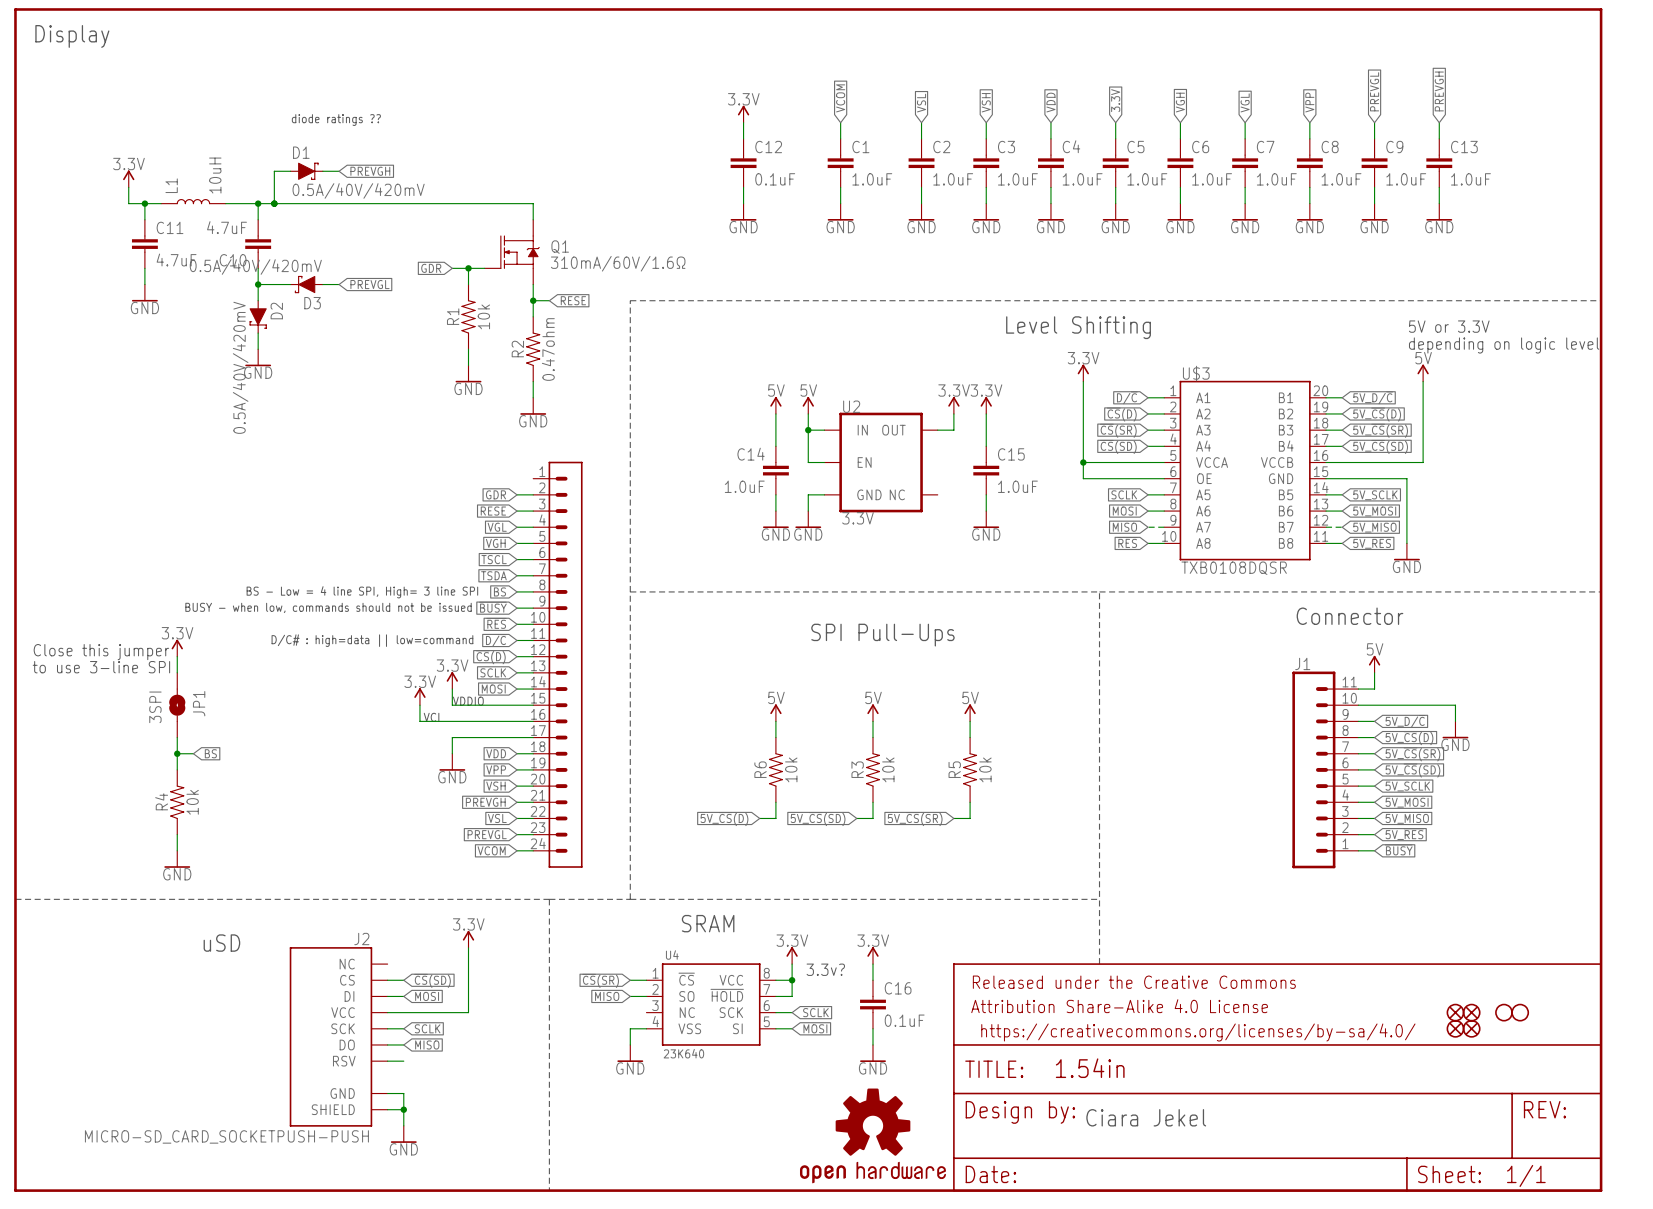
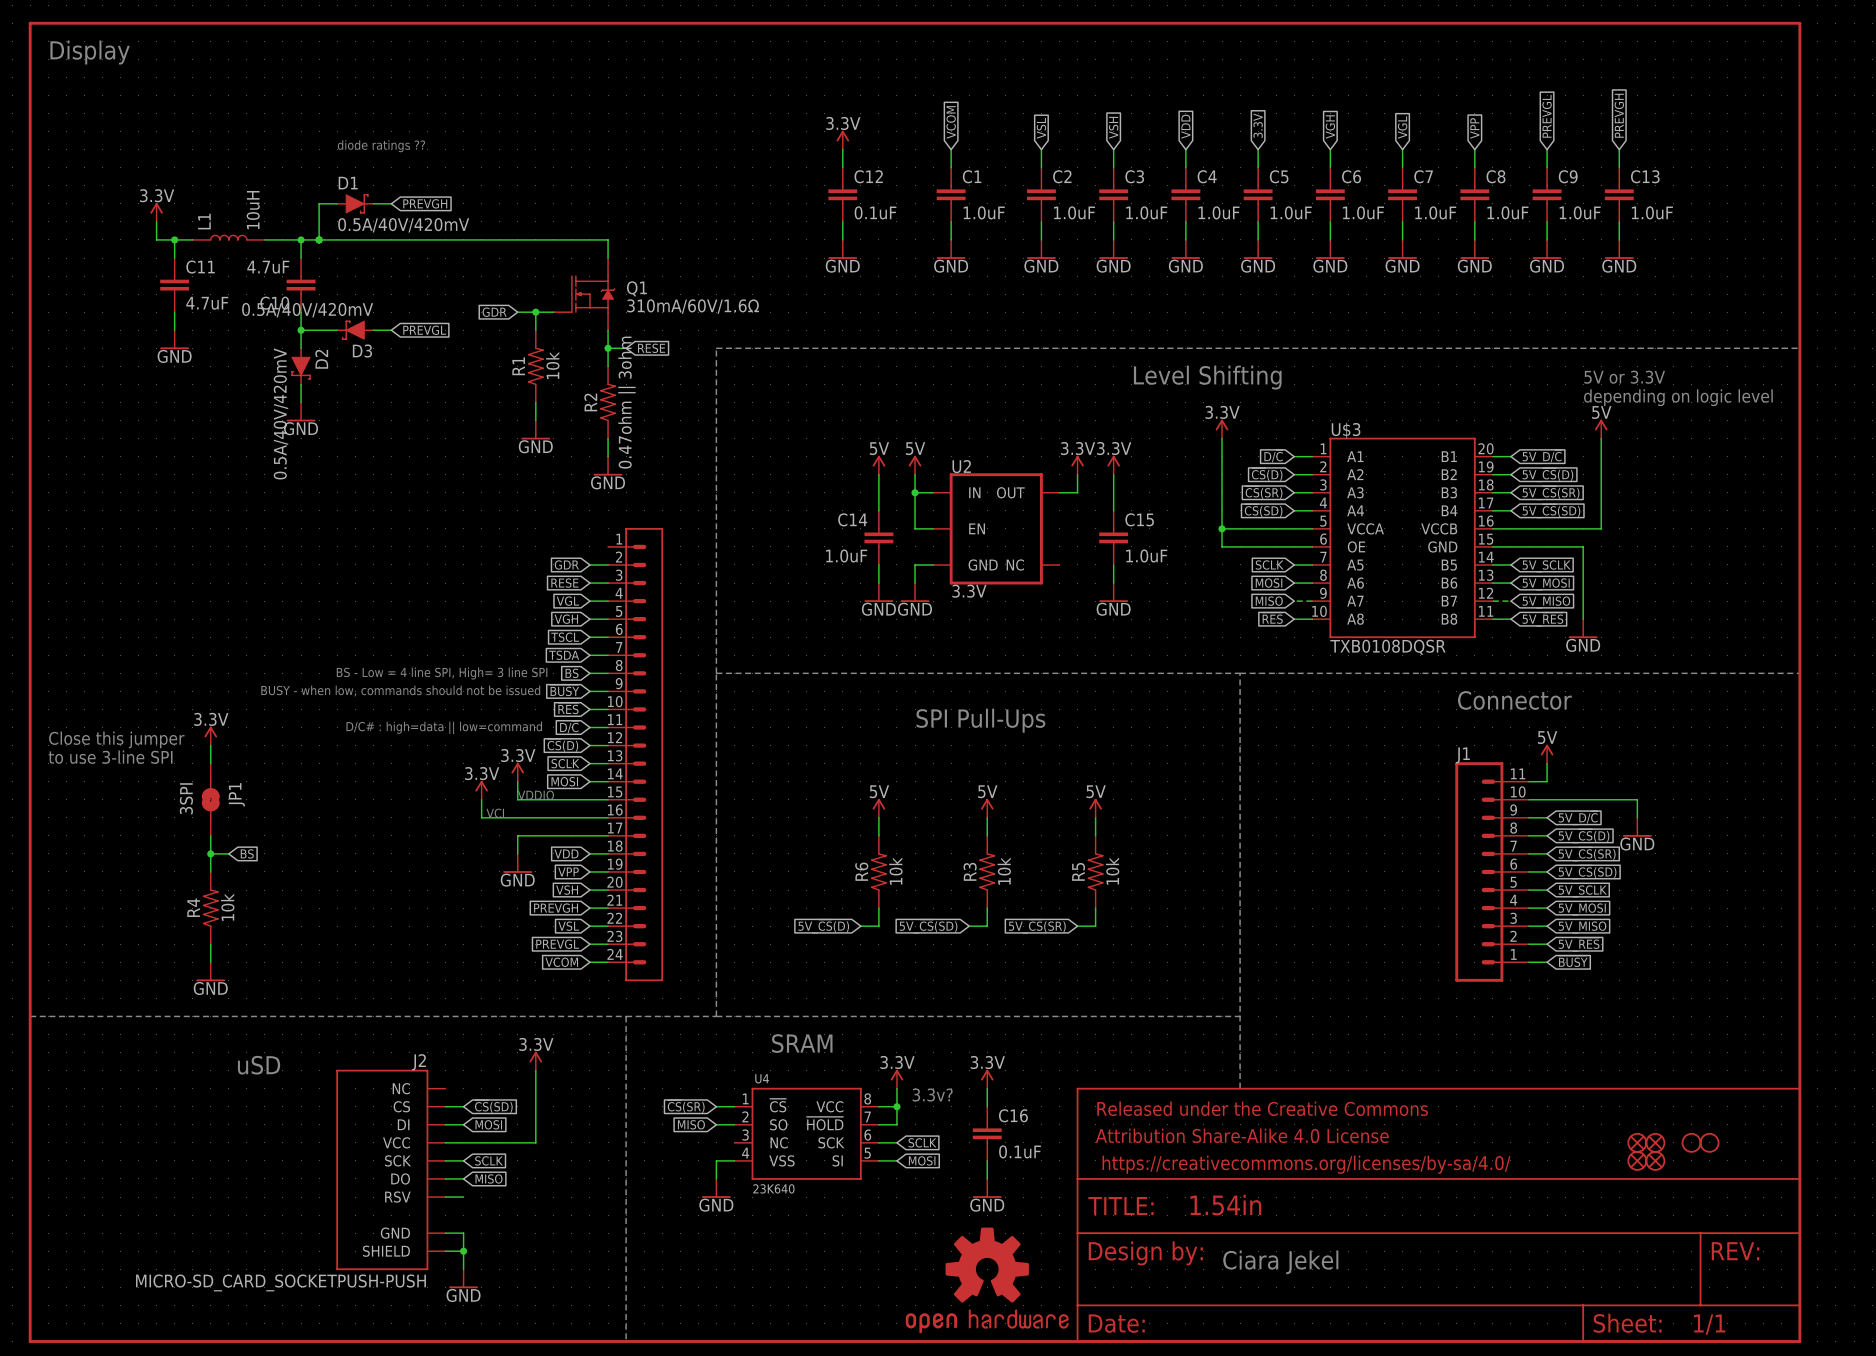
R2 value: 0.47ohm (548, 349) -> 0.47ohm || 3ohm (626, 402)

